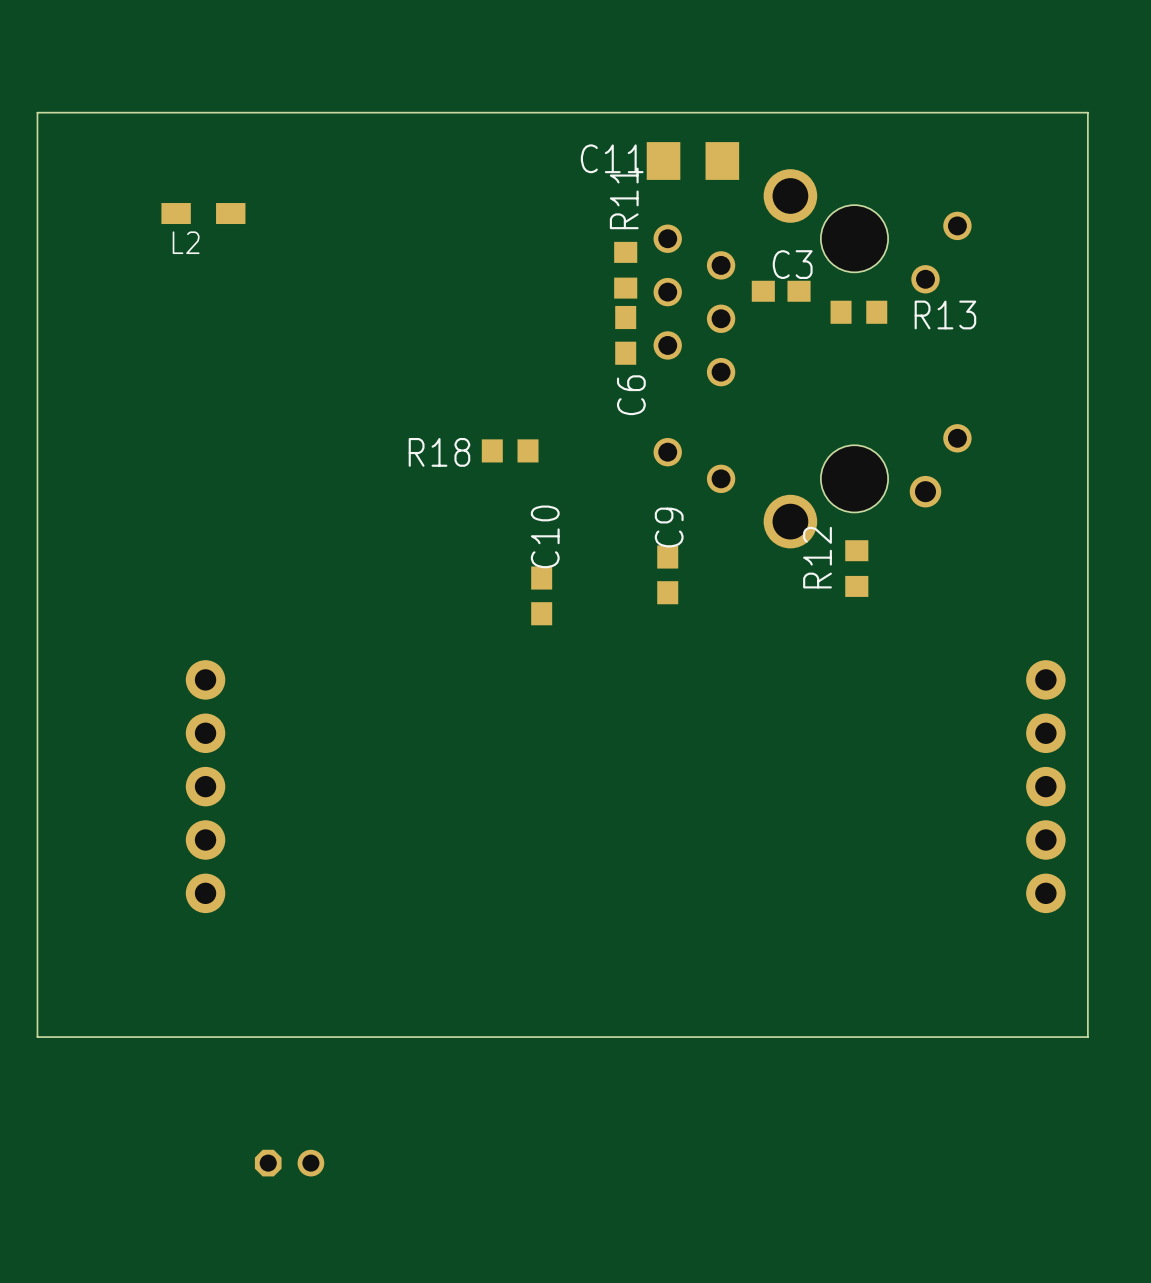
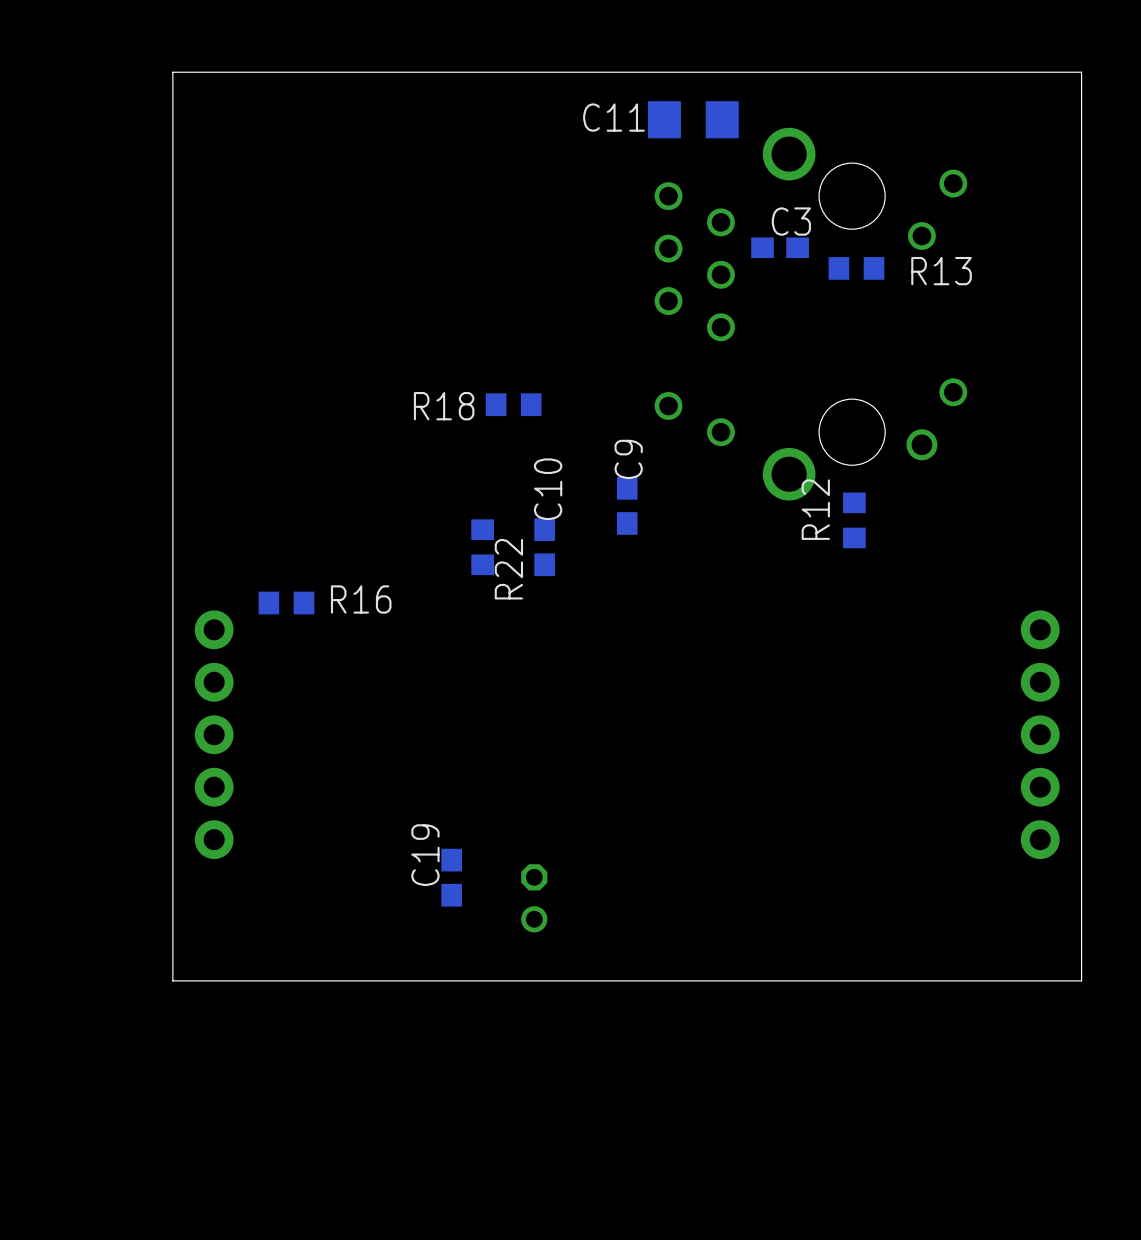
board edge: (163, 112) (37, 112) (37, 1037) (163, 1037) -> (172, 72) (172, 980)
L2: (203, 213) -> none
R11: (625, 270) -> none
C6: (625, 335) -> none
C9 position: (667, 574) -> (627, 505)
R22: none -> (482, 547)
R16: none -> (286, 602)
C19: none -> (451, 877)
part rotation: 0° (289, 1163) -> 90° clockwise (534, 898)
part position: (289, 1163) -> (534, 898)

